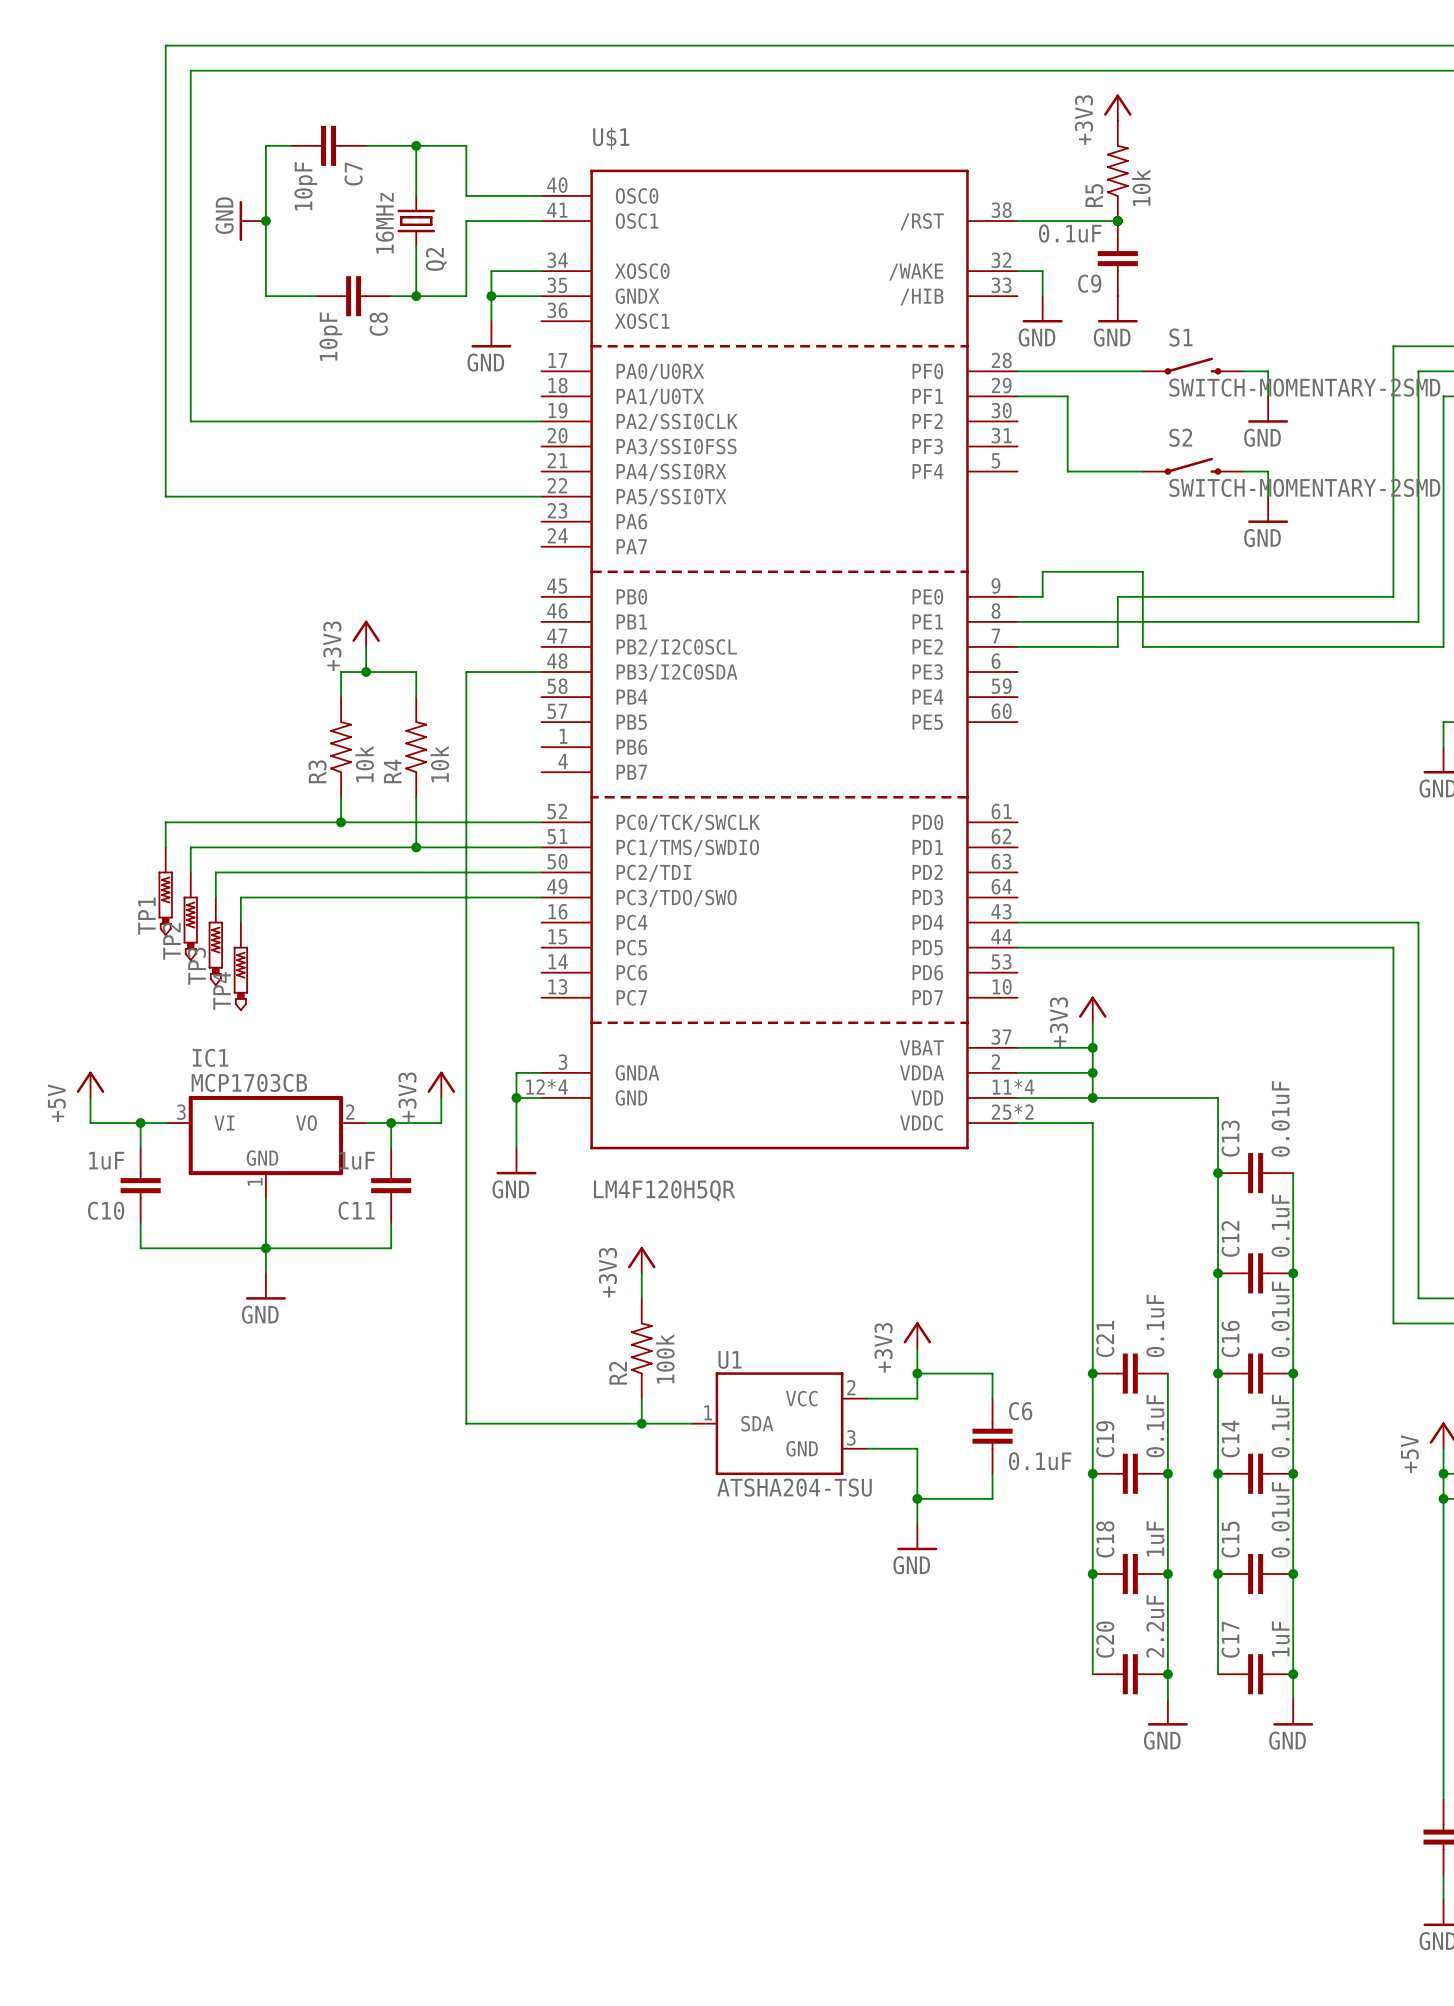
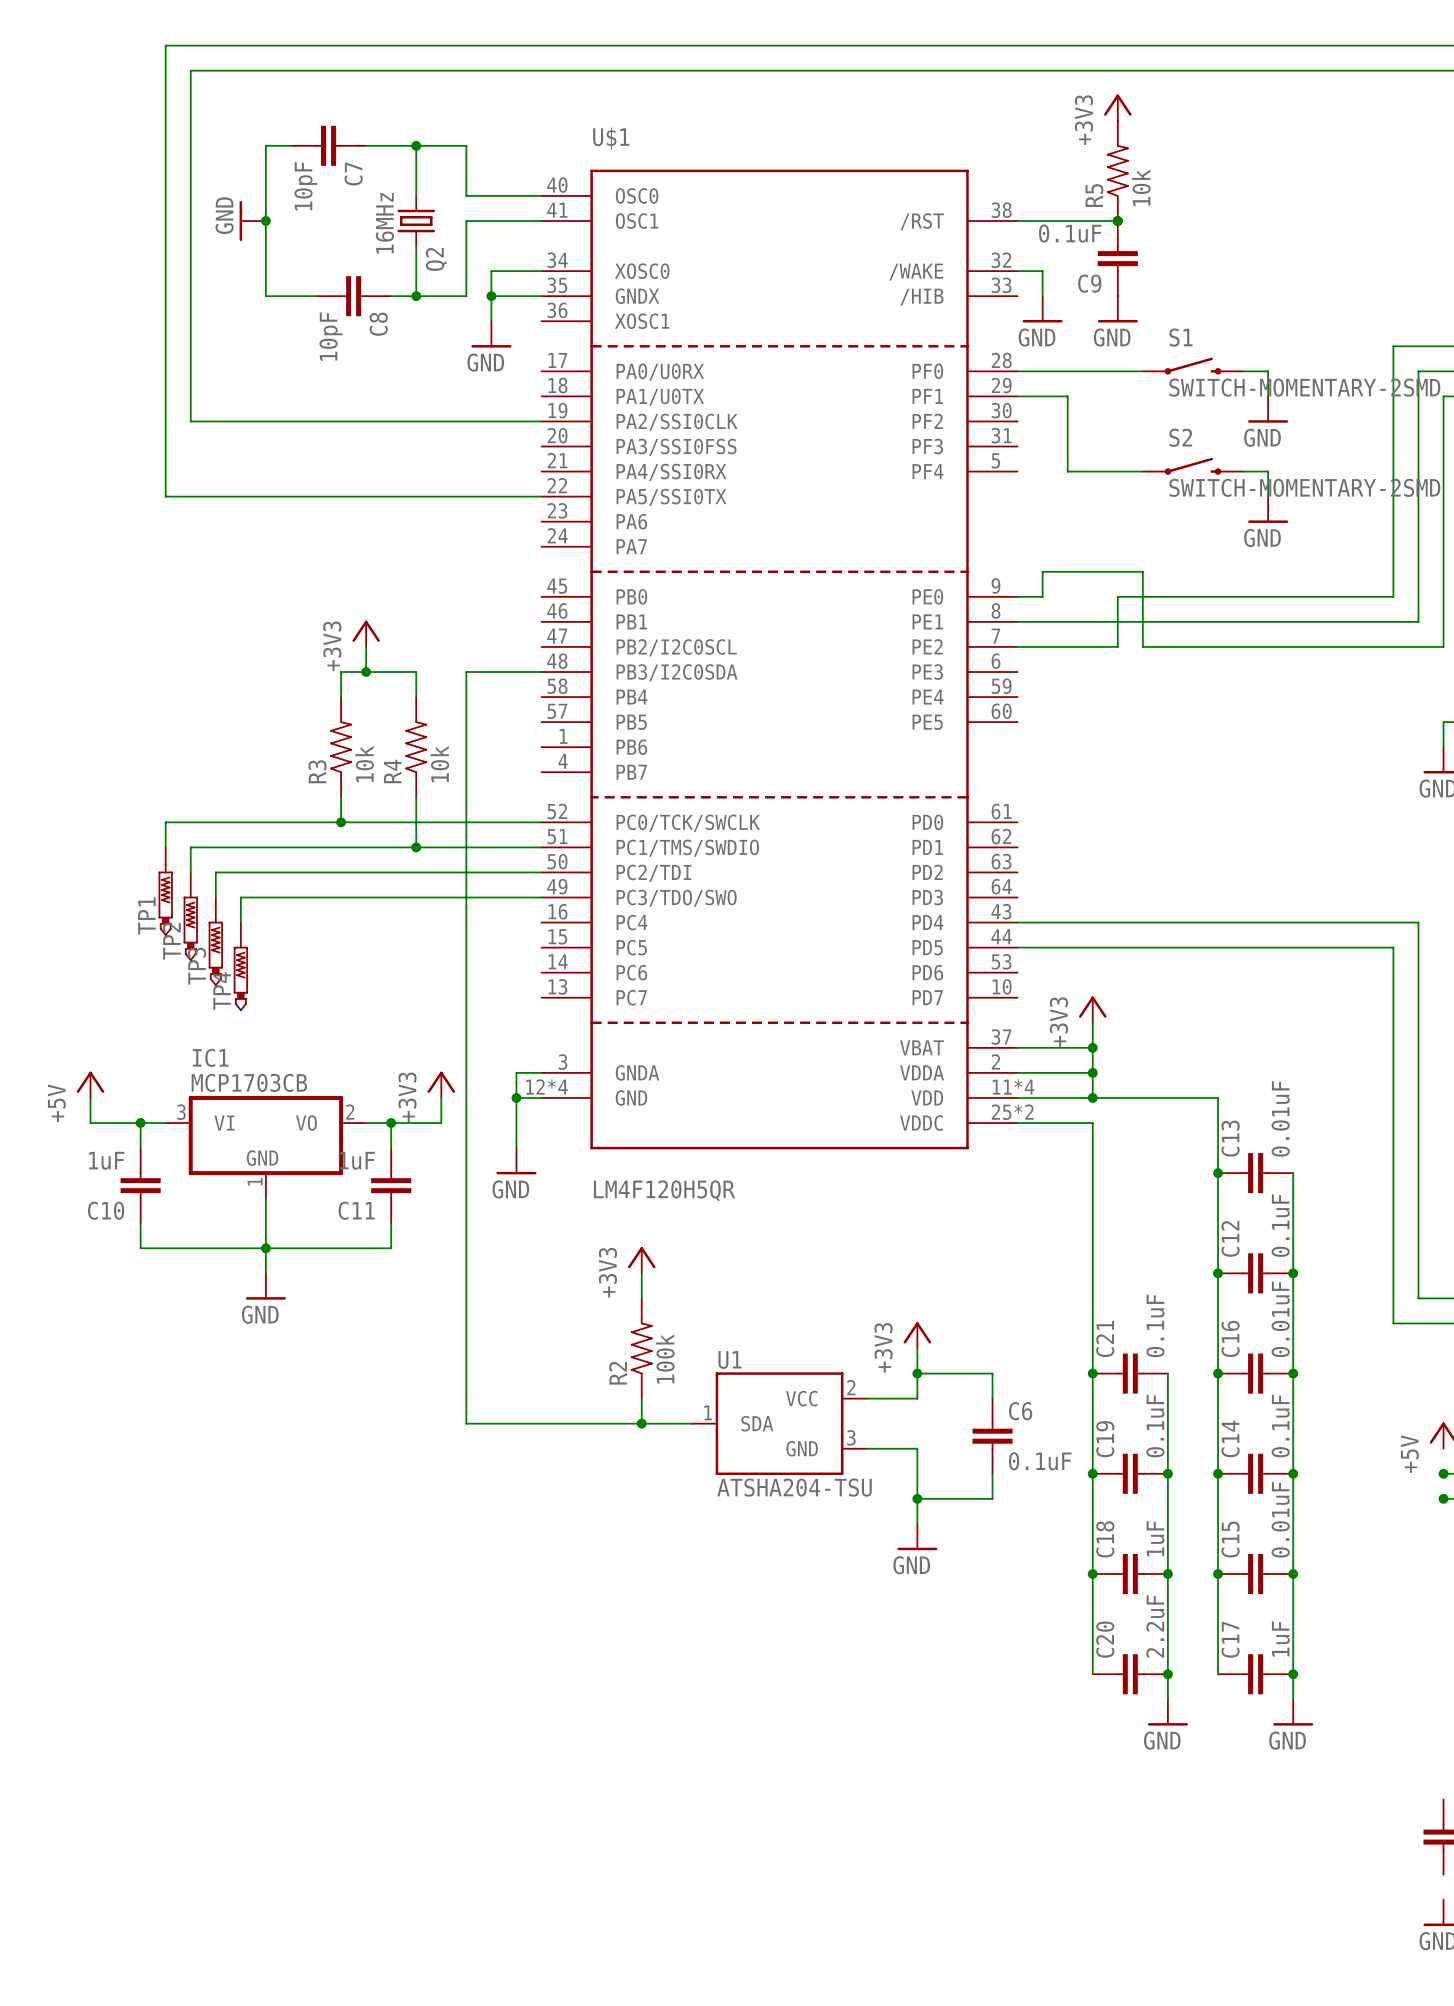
wire: (1443, 1448) (1443, 1799) -> none
wire: (1443, 1874) (1443, 1899) -> none

